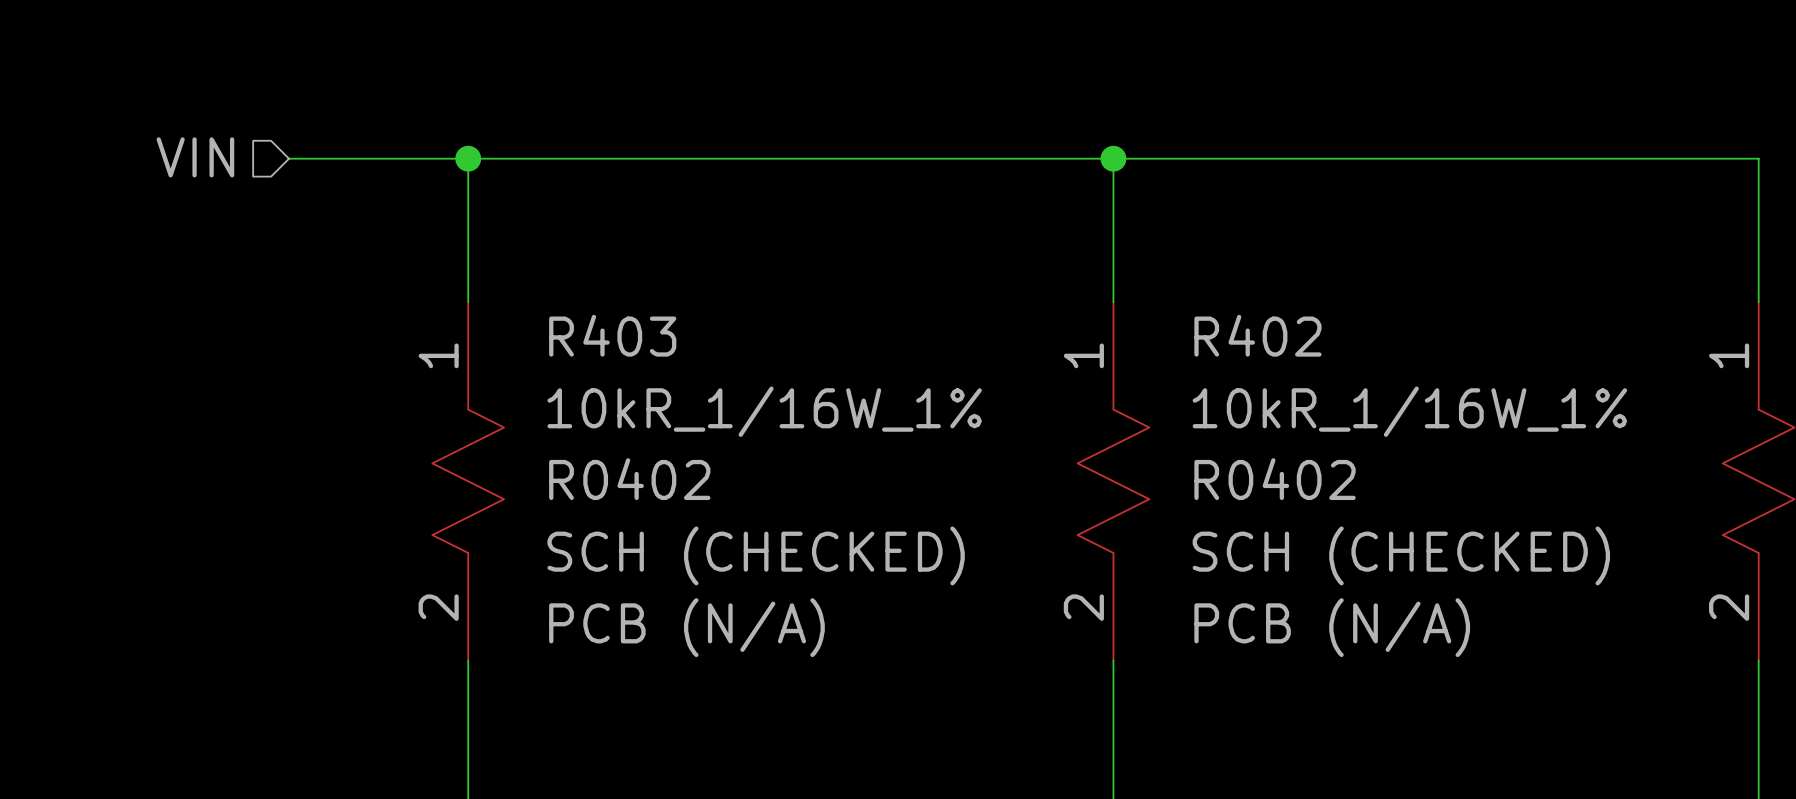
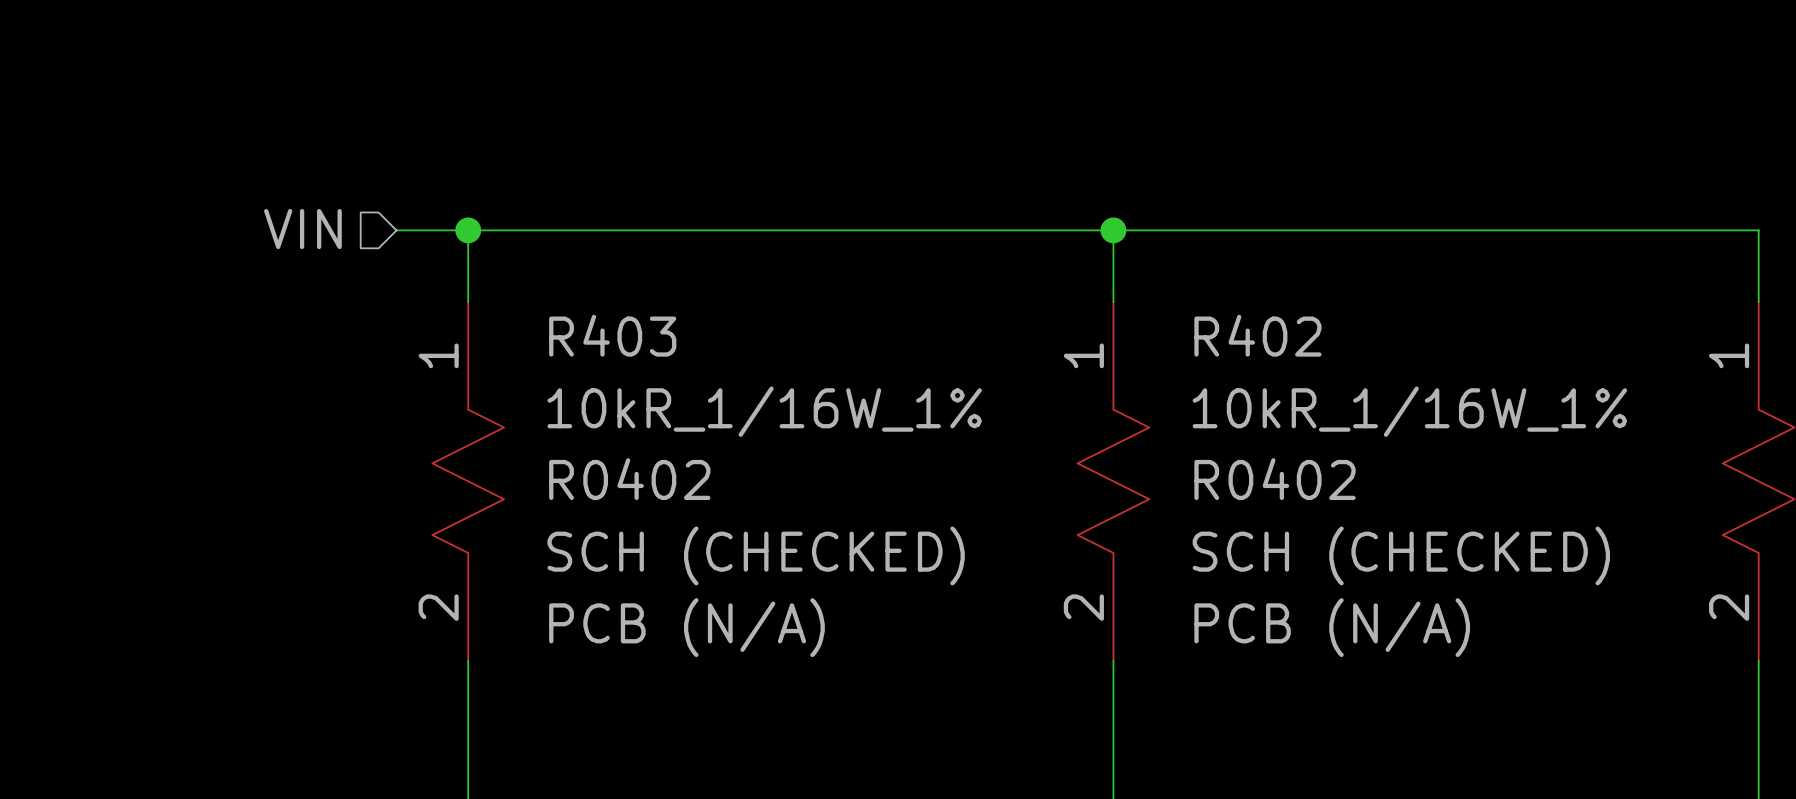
hierarchical label position: VIN (195, 157) -> VIN (302, 229)
wire: (288, 158) (1758, 158) (1758, 230) -> (396, 230) (1758, 230)
wire: (468, 158) (468, 230) -> none
junction position: (468, 158) -> (468, 230)
wire: (1113, 158) (1113, 230) -> none
junction position: (1113, 158) -> (1113, 230)

